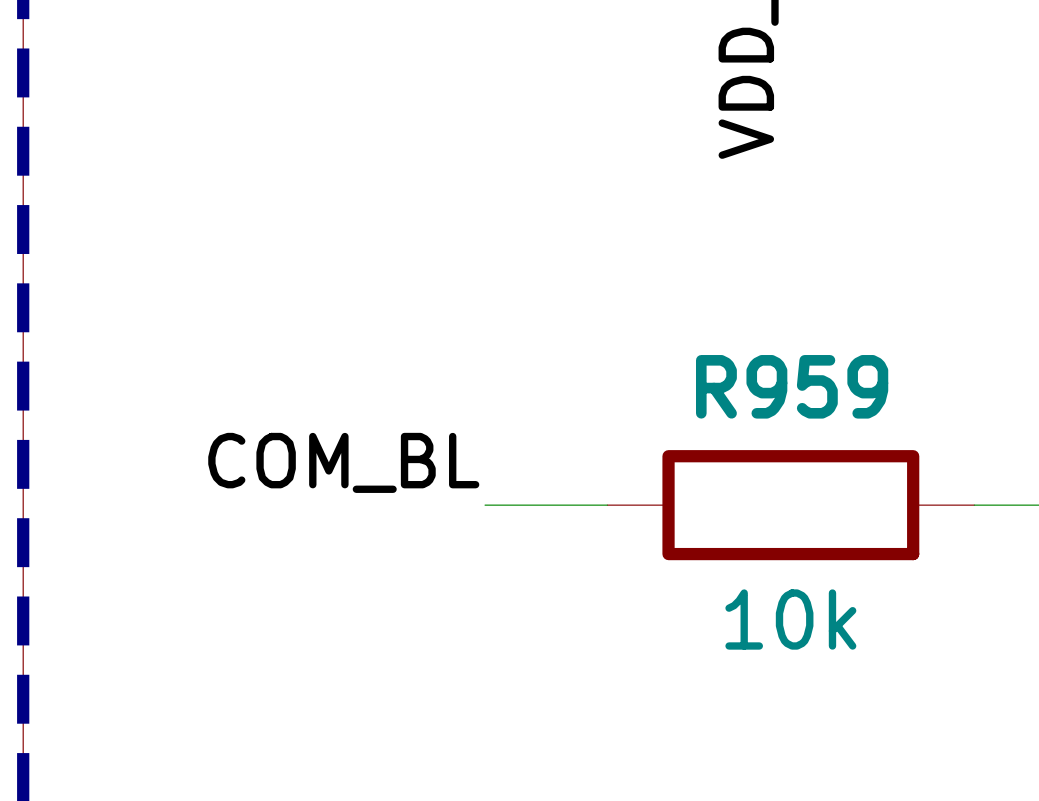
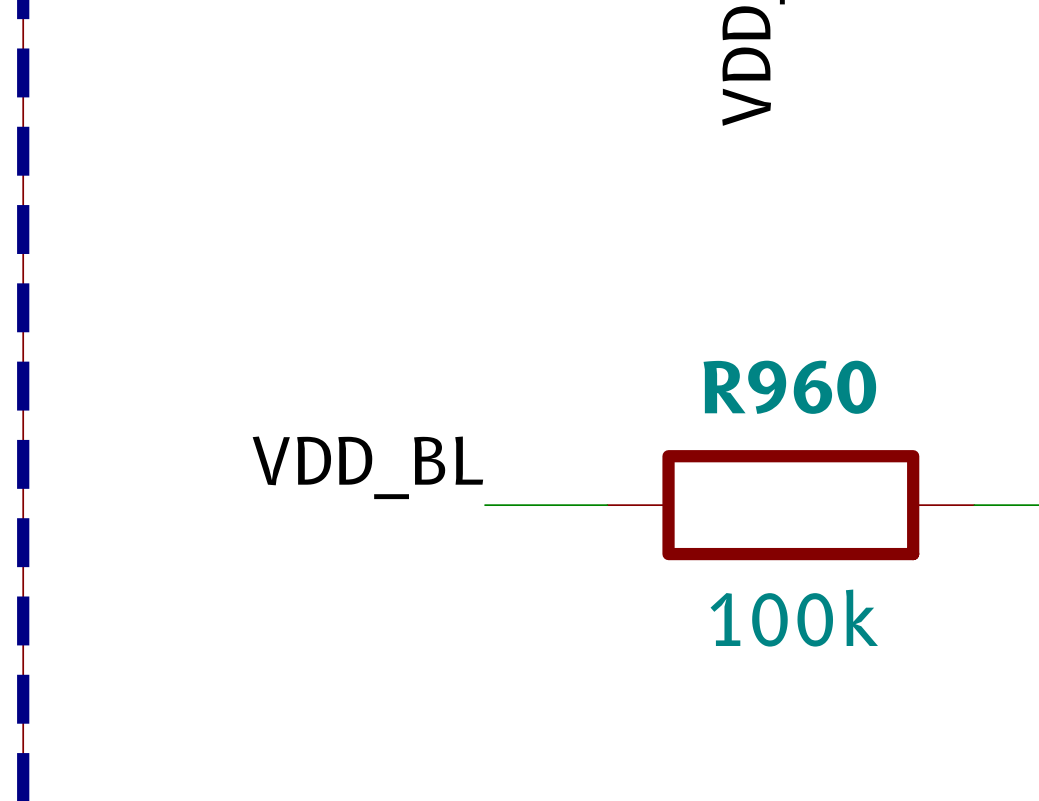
R959 name: R959 (792, 386) -> R960 (789, 387)
label: COM_BL (343, 462) -> VDD_BL (367, 467)
R959 value: 10k (790, 619) -> 100k (794, 618)

